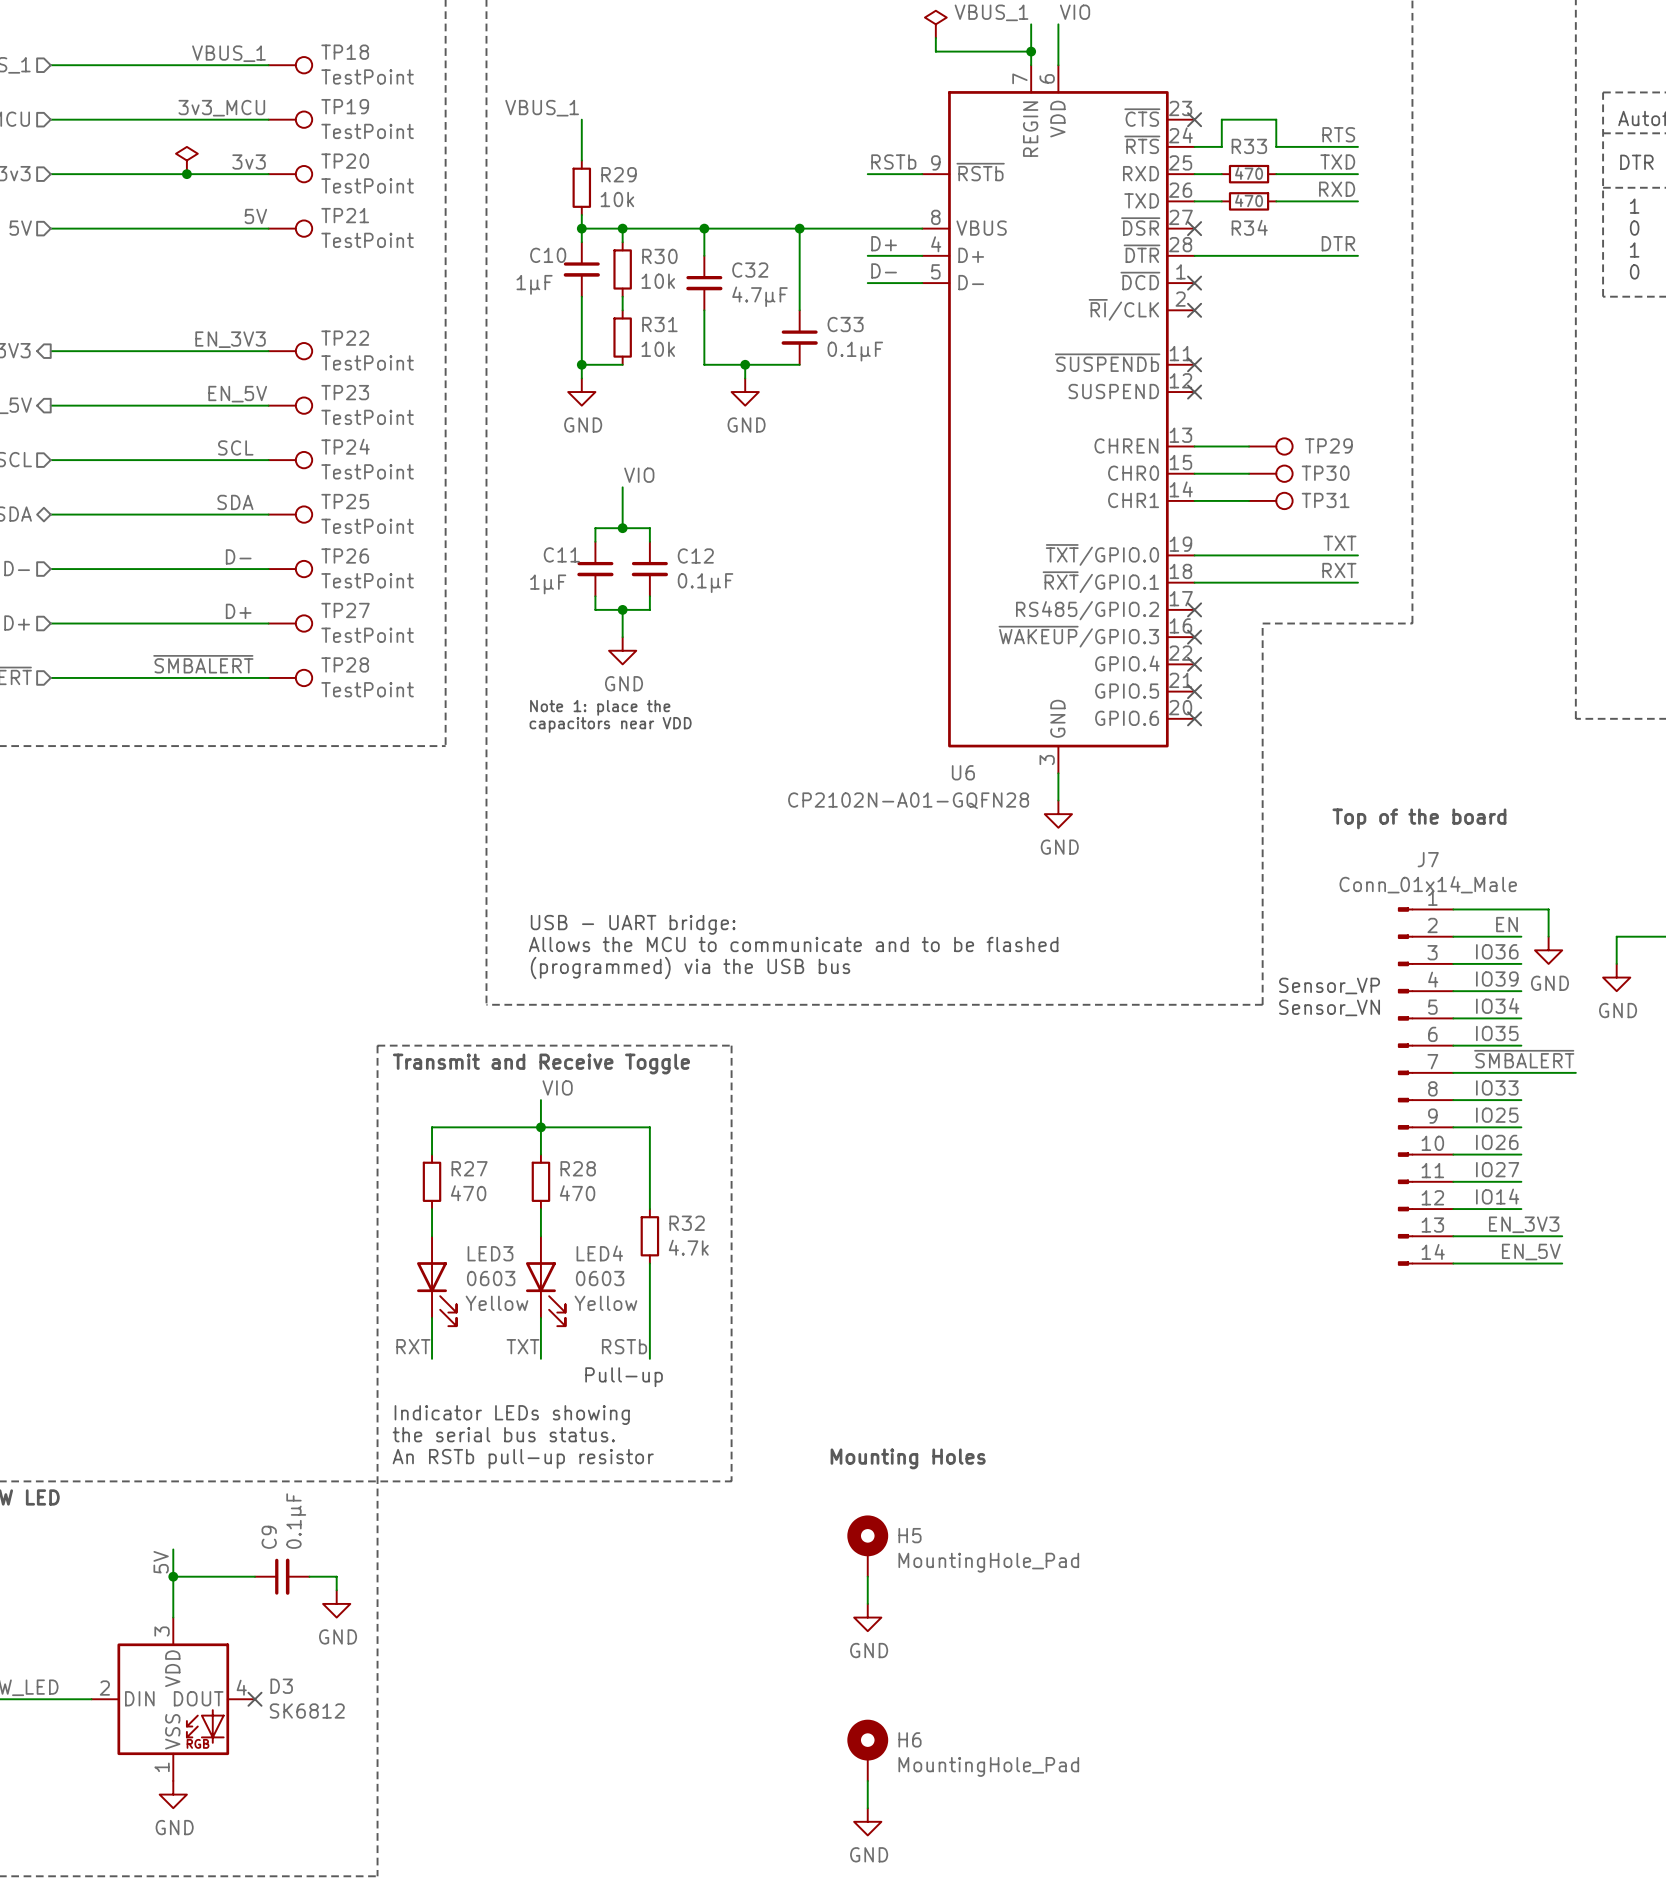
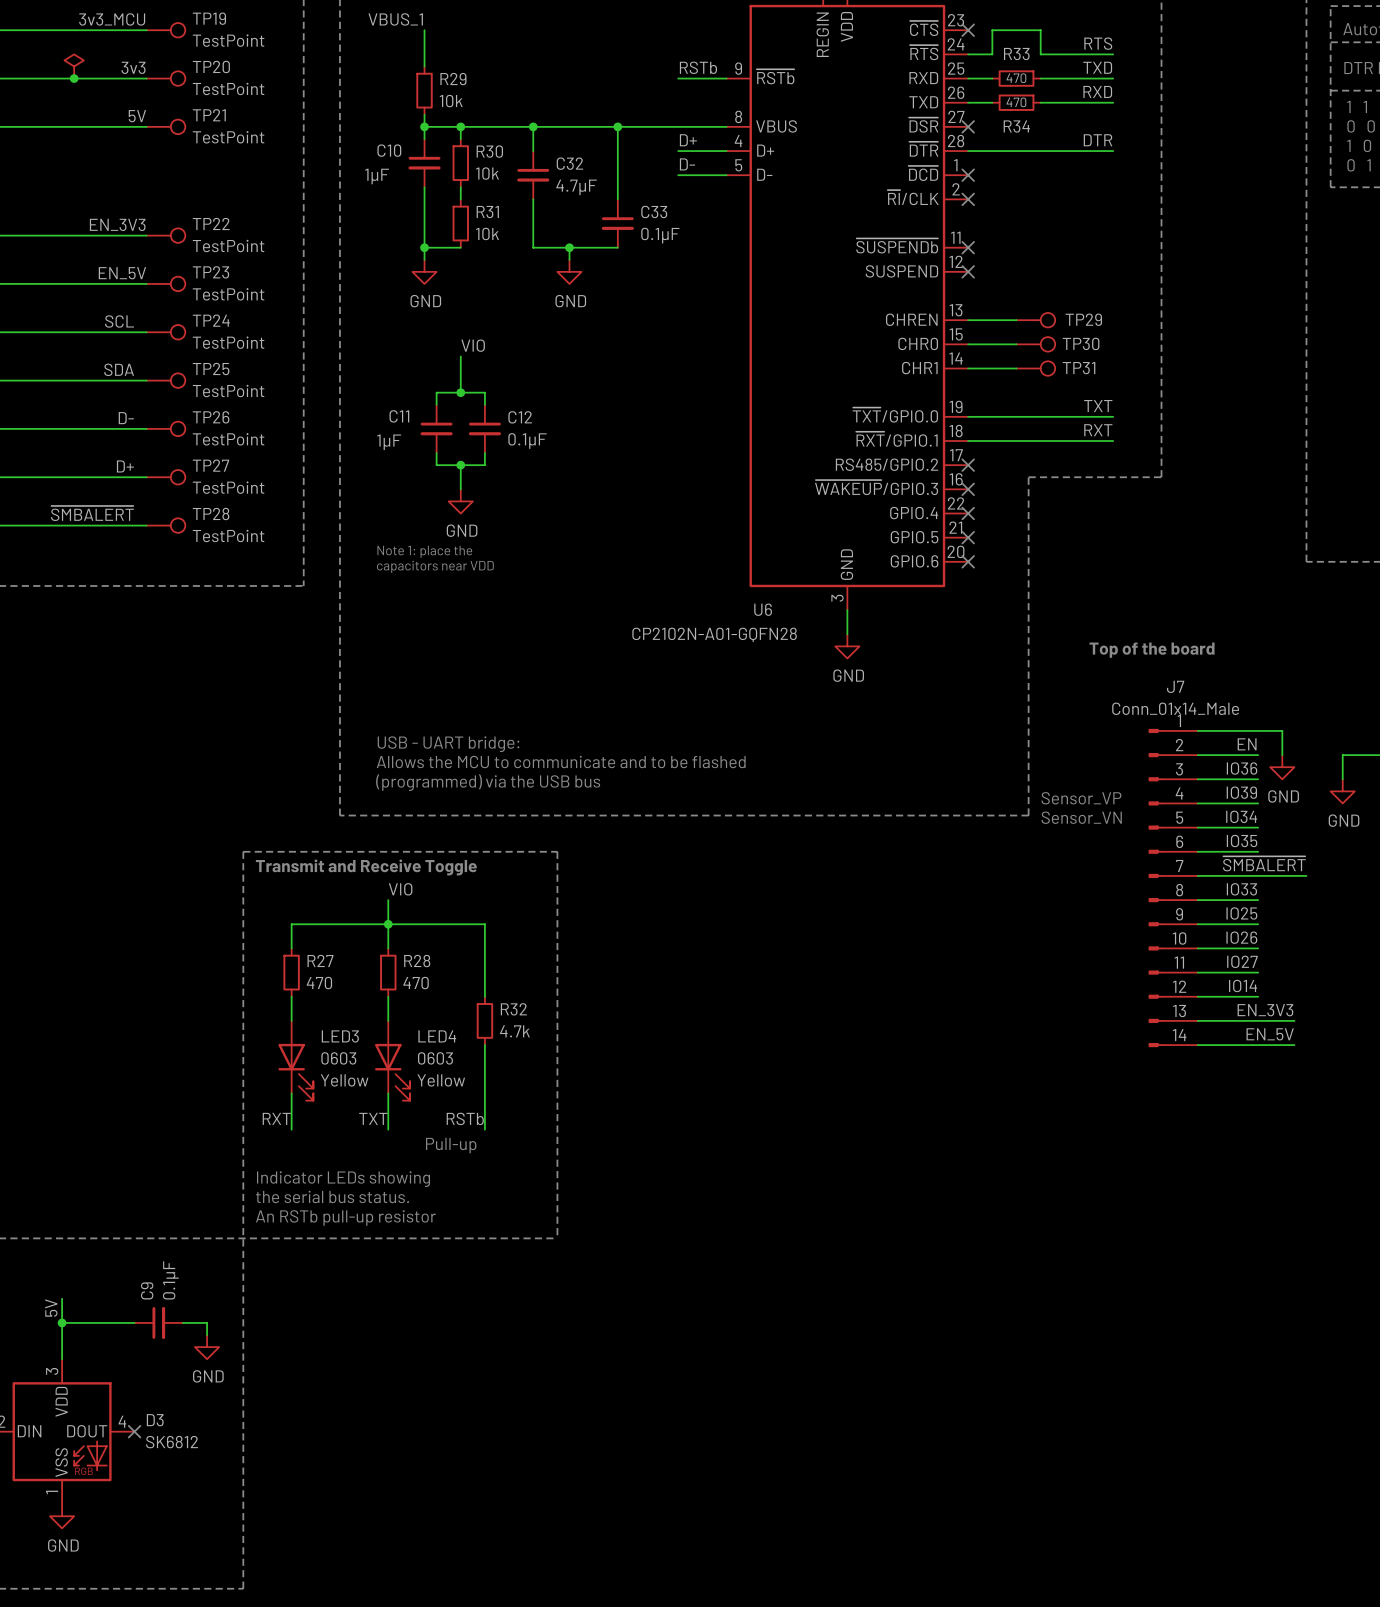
text: Mounting Holes (908, 1458) -> none
H5: MountingHole_Pad (867, 1546) -> none
wire: (867, 1576) (867, 1603) -> none
power symbol: GND (867, 1617) -> none
H6: MountingHole_Pad (867, 1750) -> none
wire: (867, 1780) (867, 1808) -> none
power symbol: GND (867, 1821) -> none

